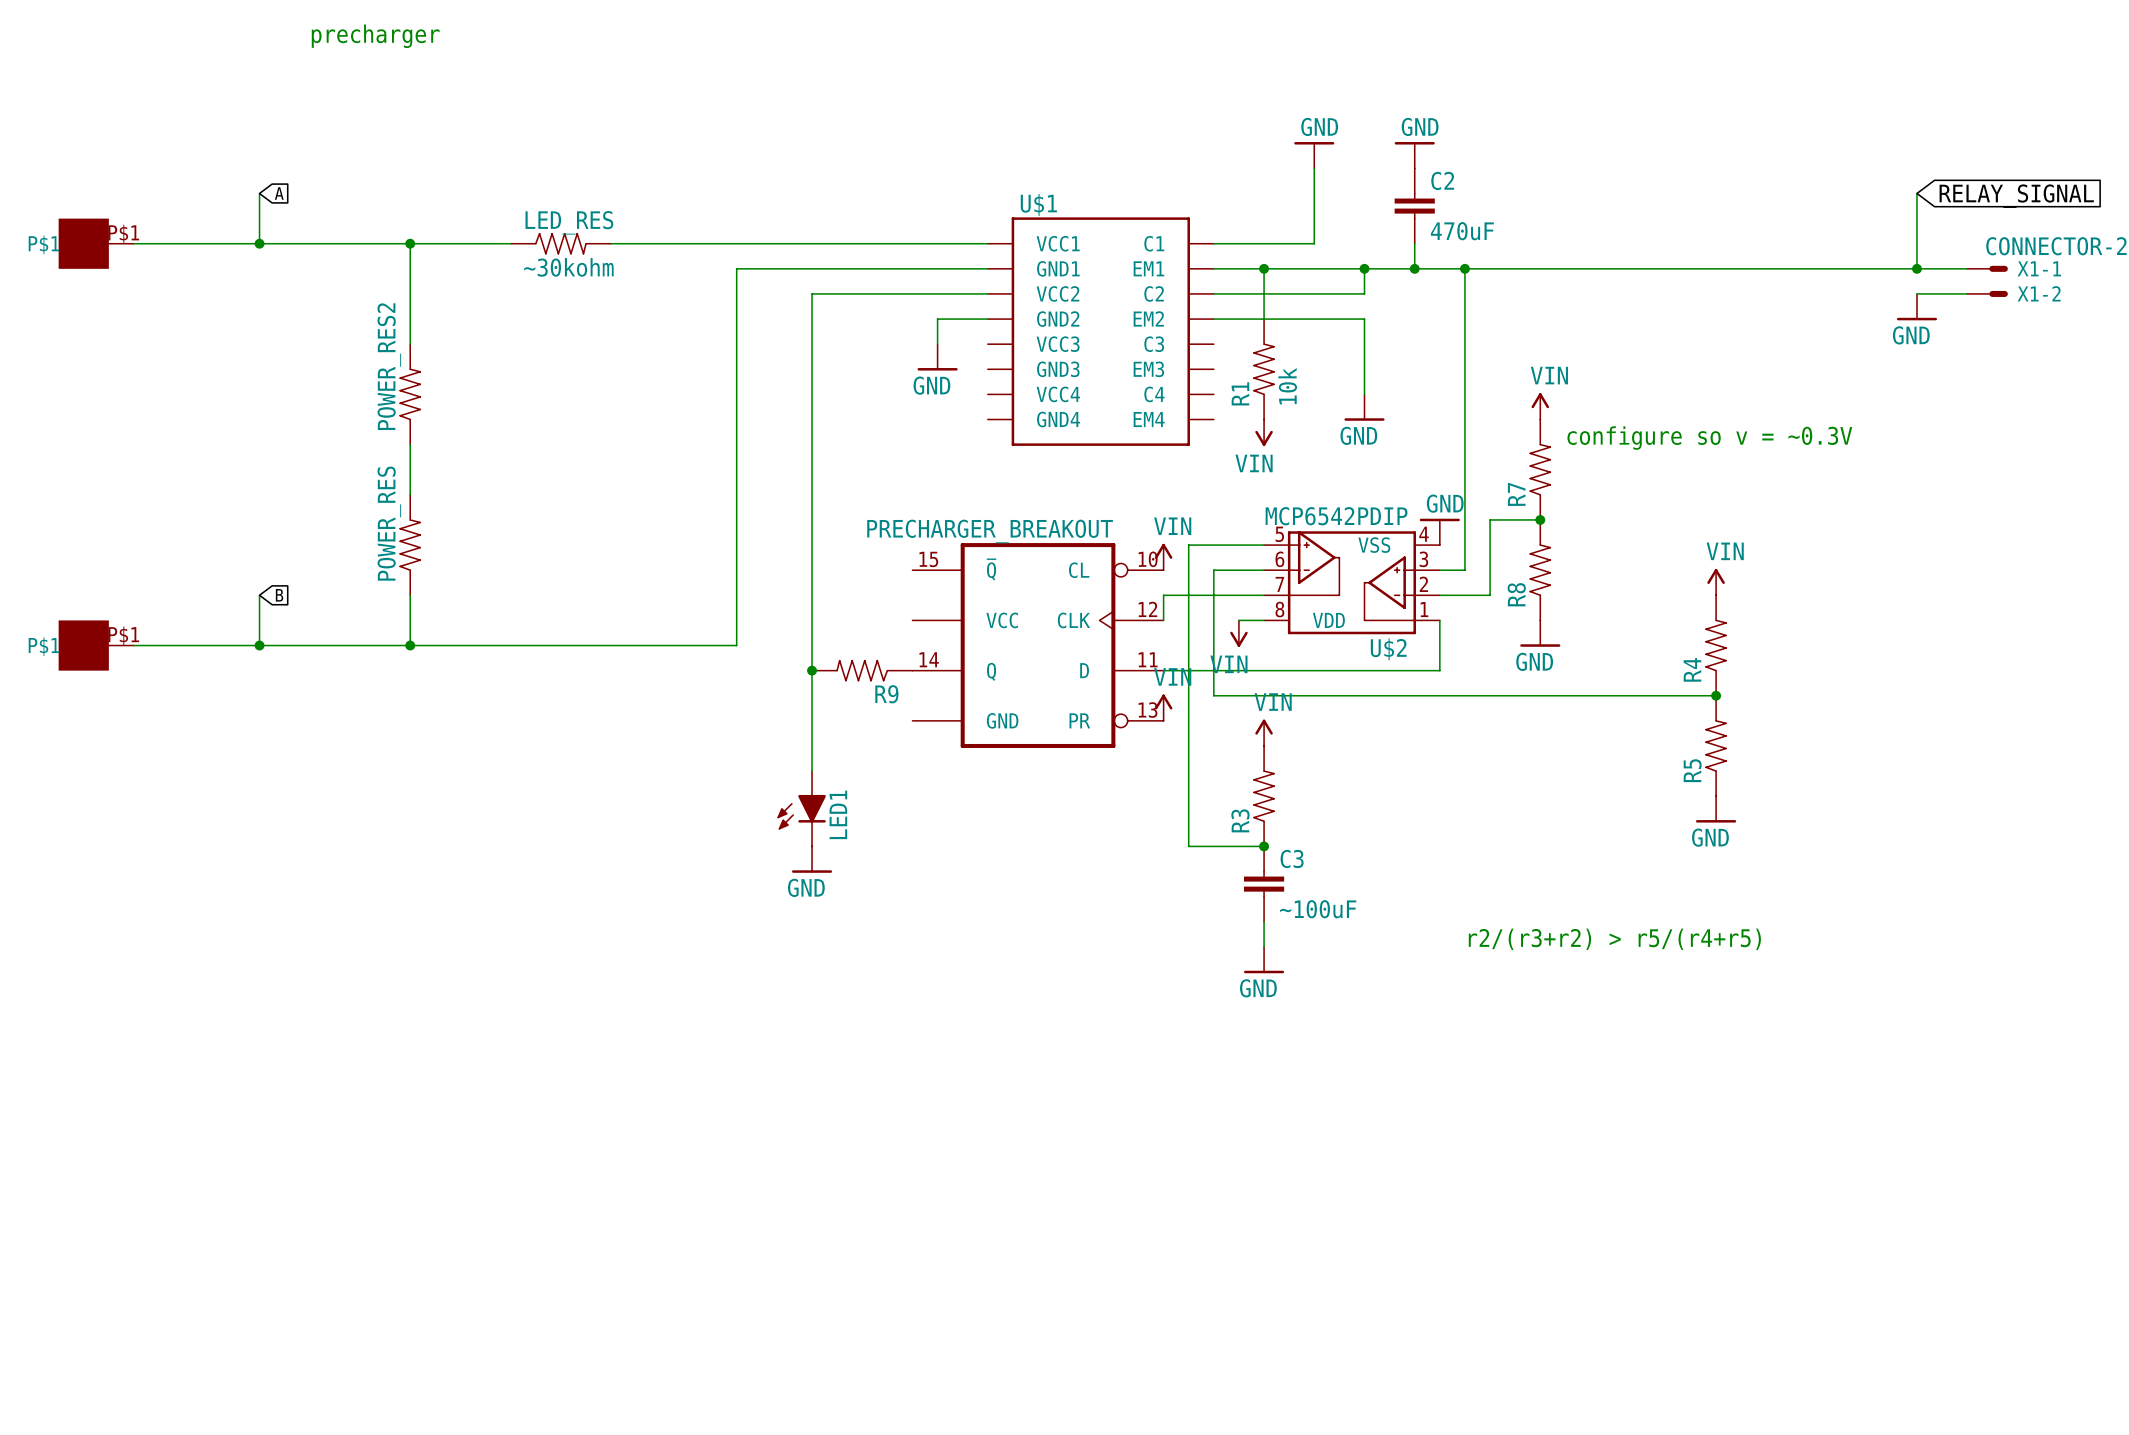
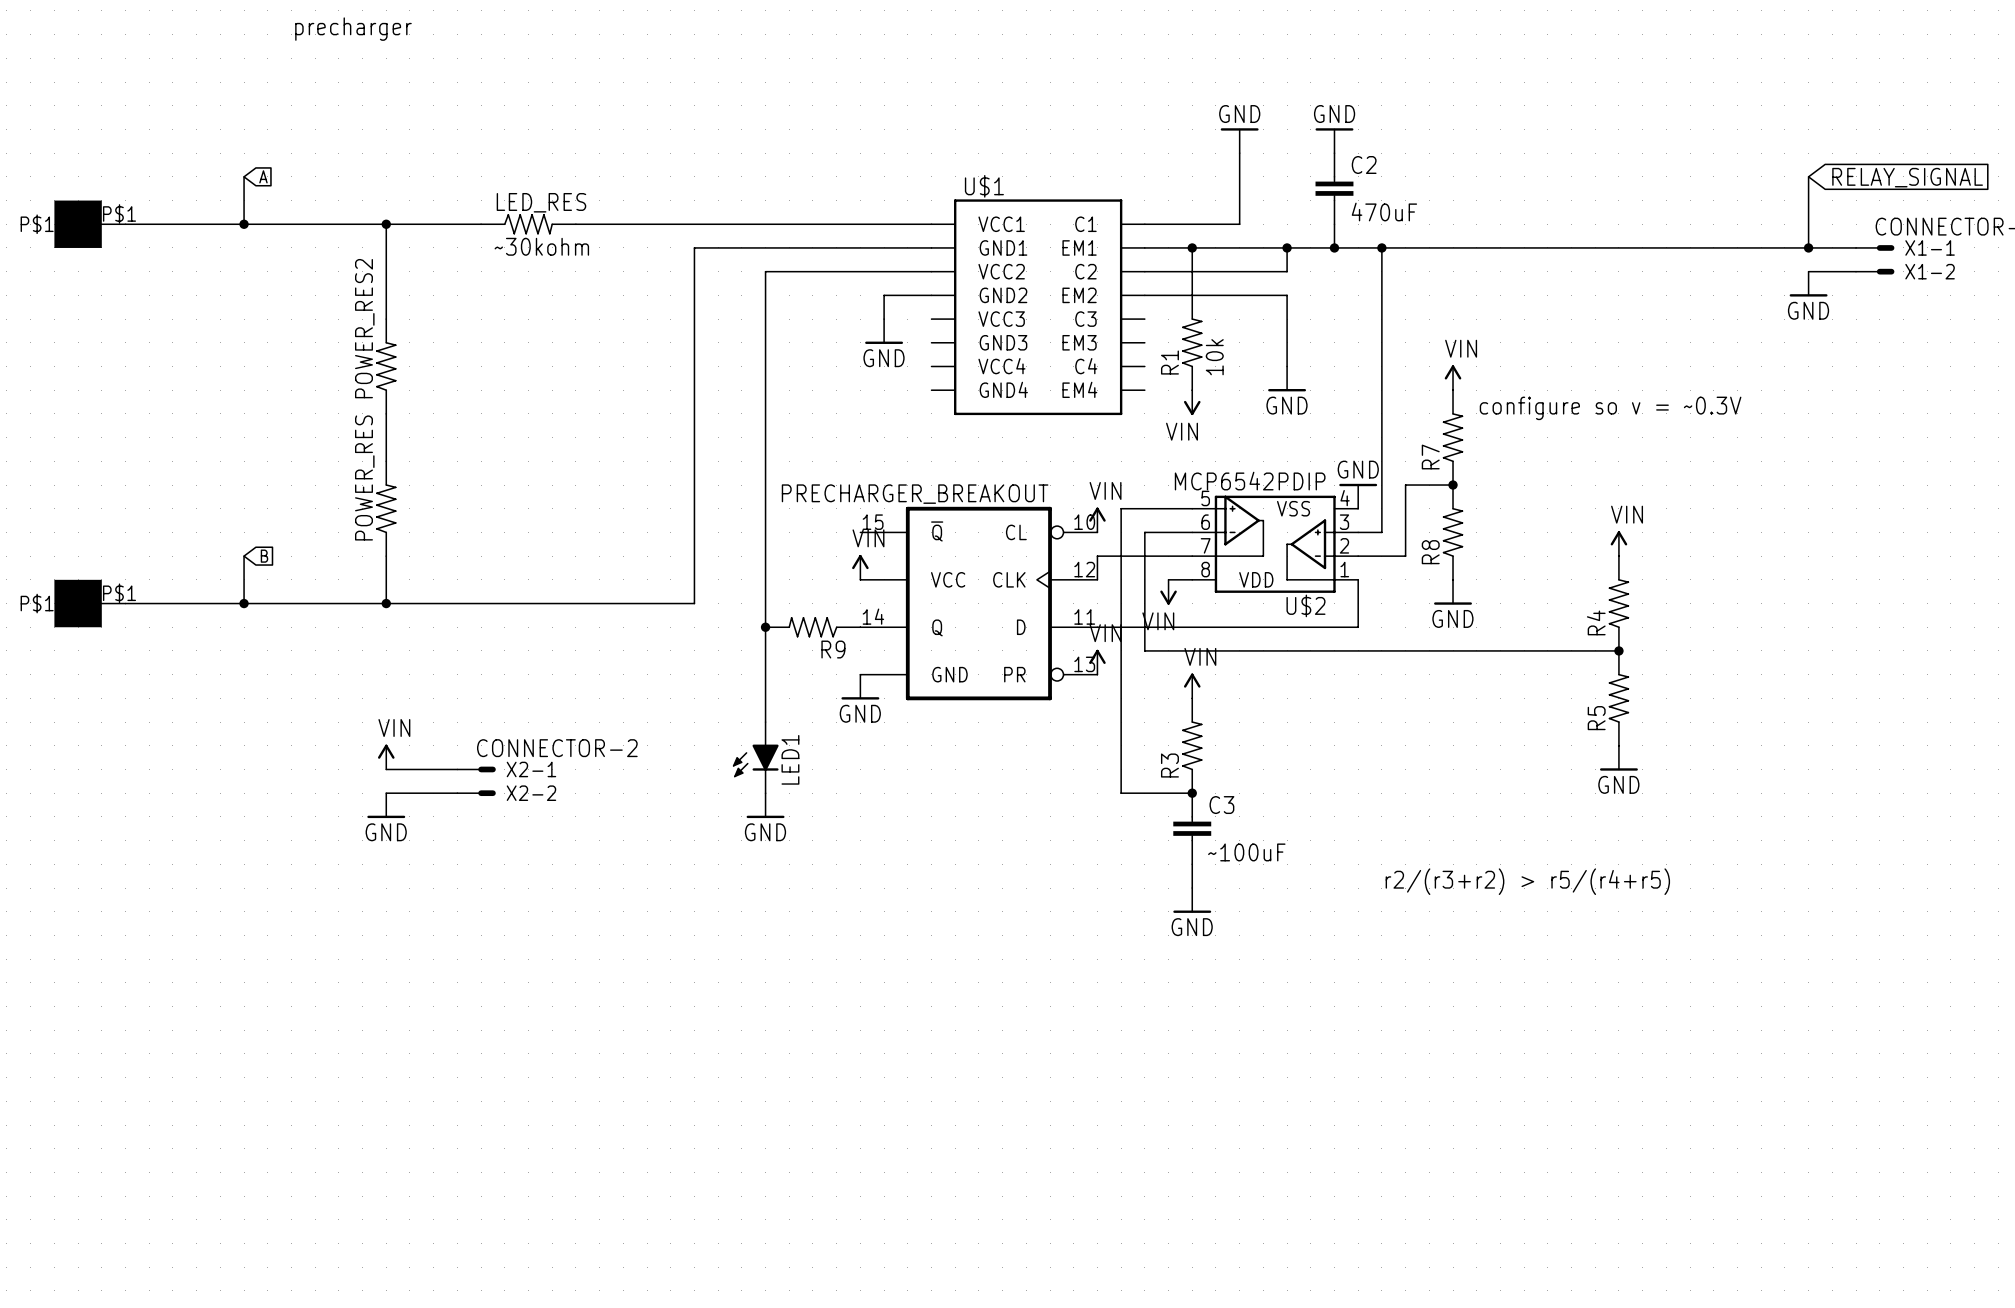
power symbol: none -> VIN (860, 567)
power symbol: none -> GND (860, 687)
power symbol: none -> VIN (386, 757)
wire: none -> (386, 769) (457, 769)
X2-1: none -> CONNECTOR-2 (476, 769)
wire: none -> (386, 793) (457, 793)
X2-2: none -> (476, 793)
power symbol: none -> GND (386, 805)

